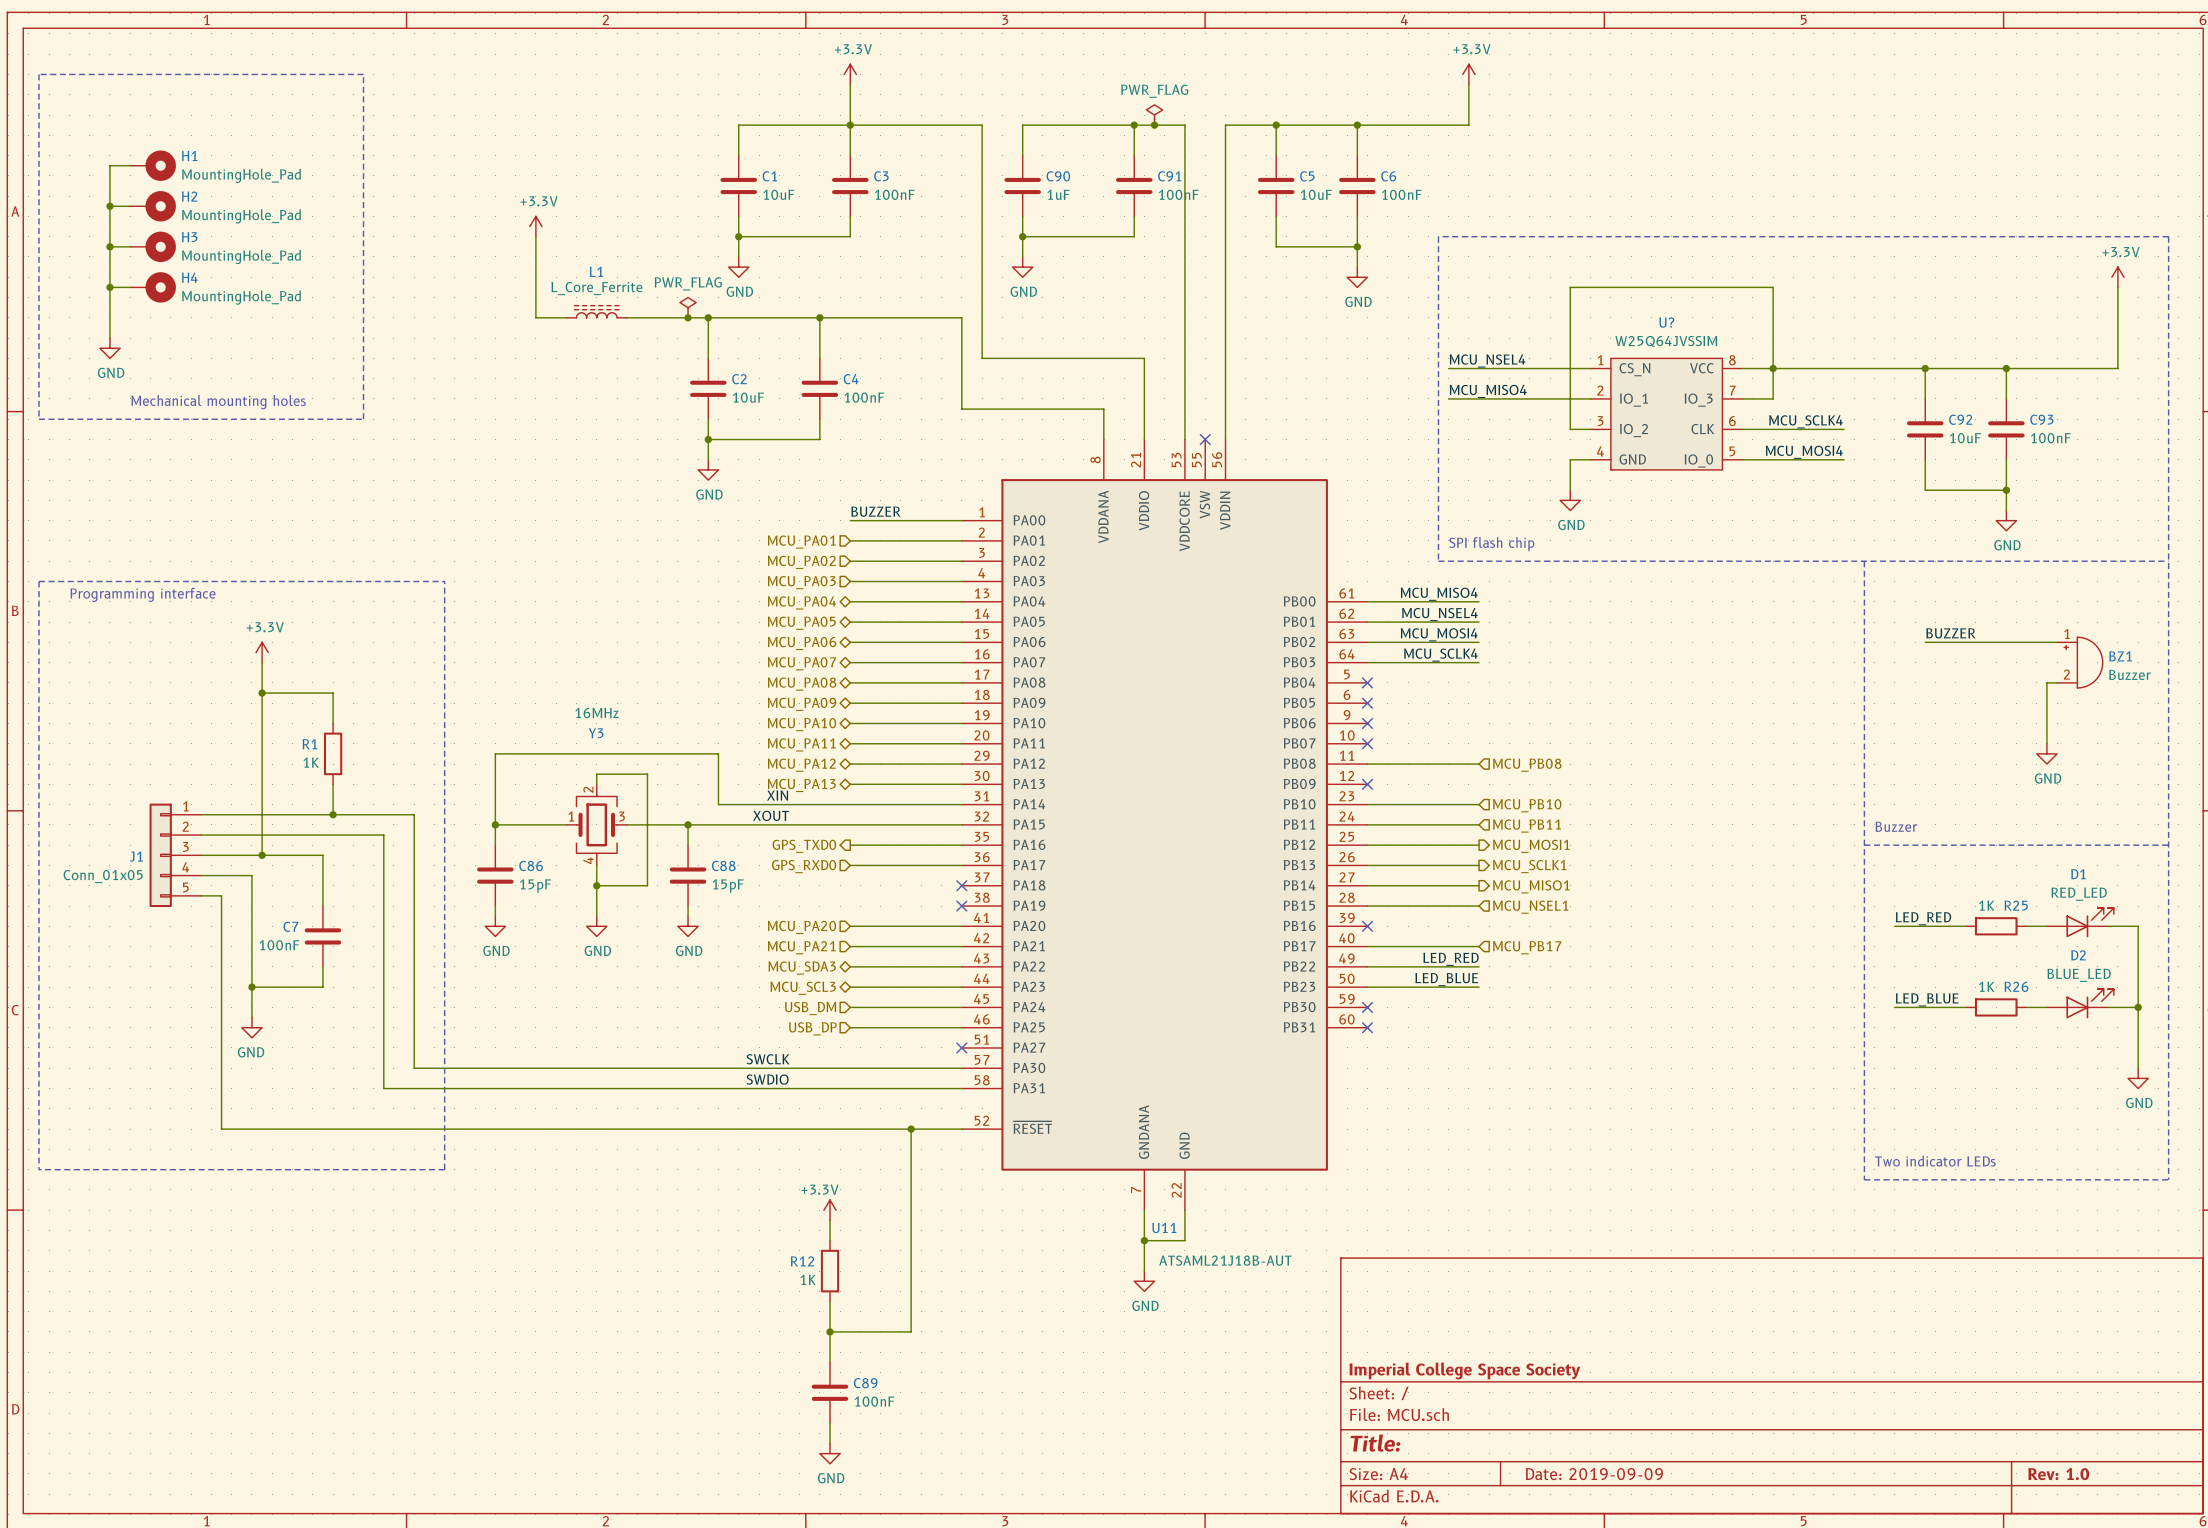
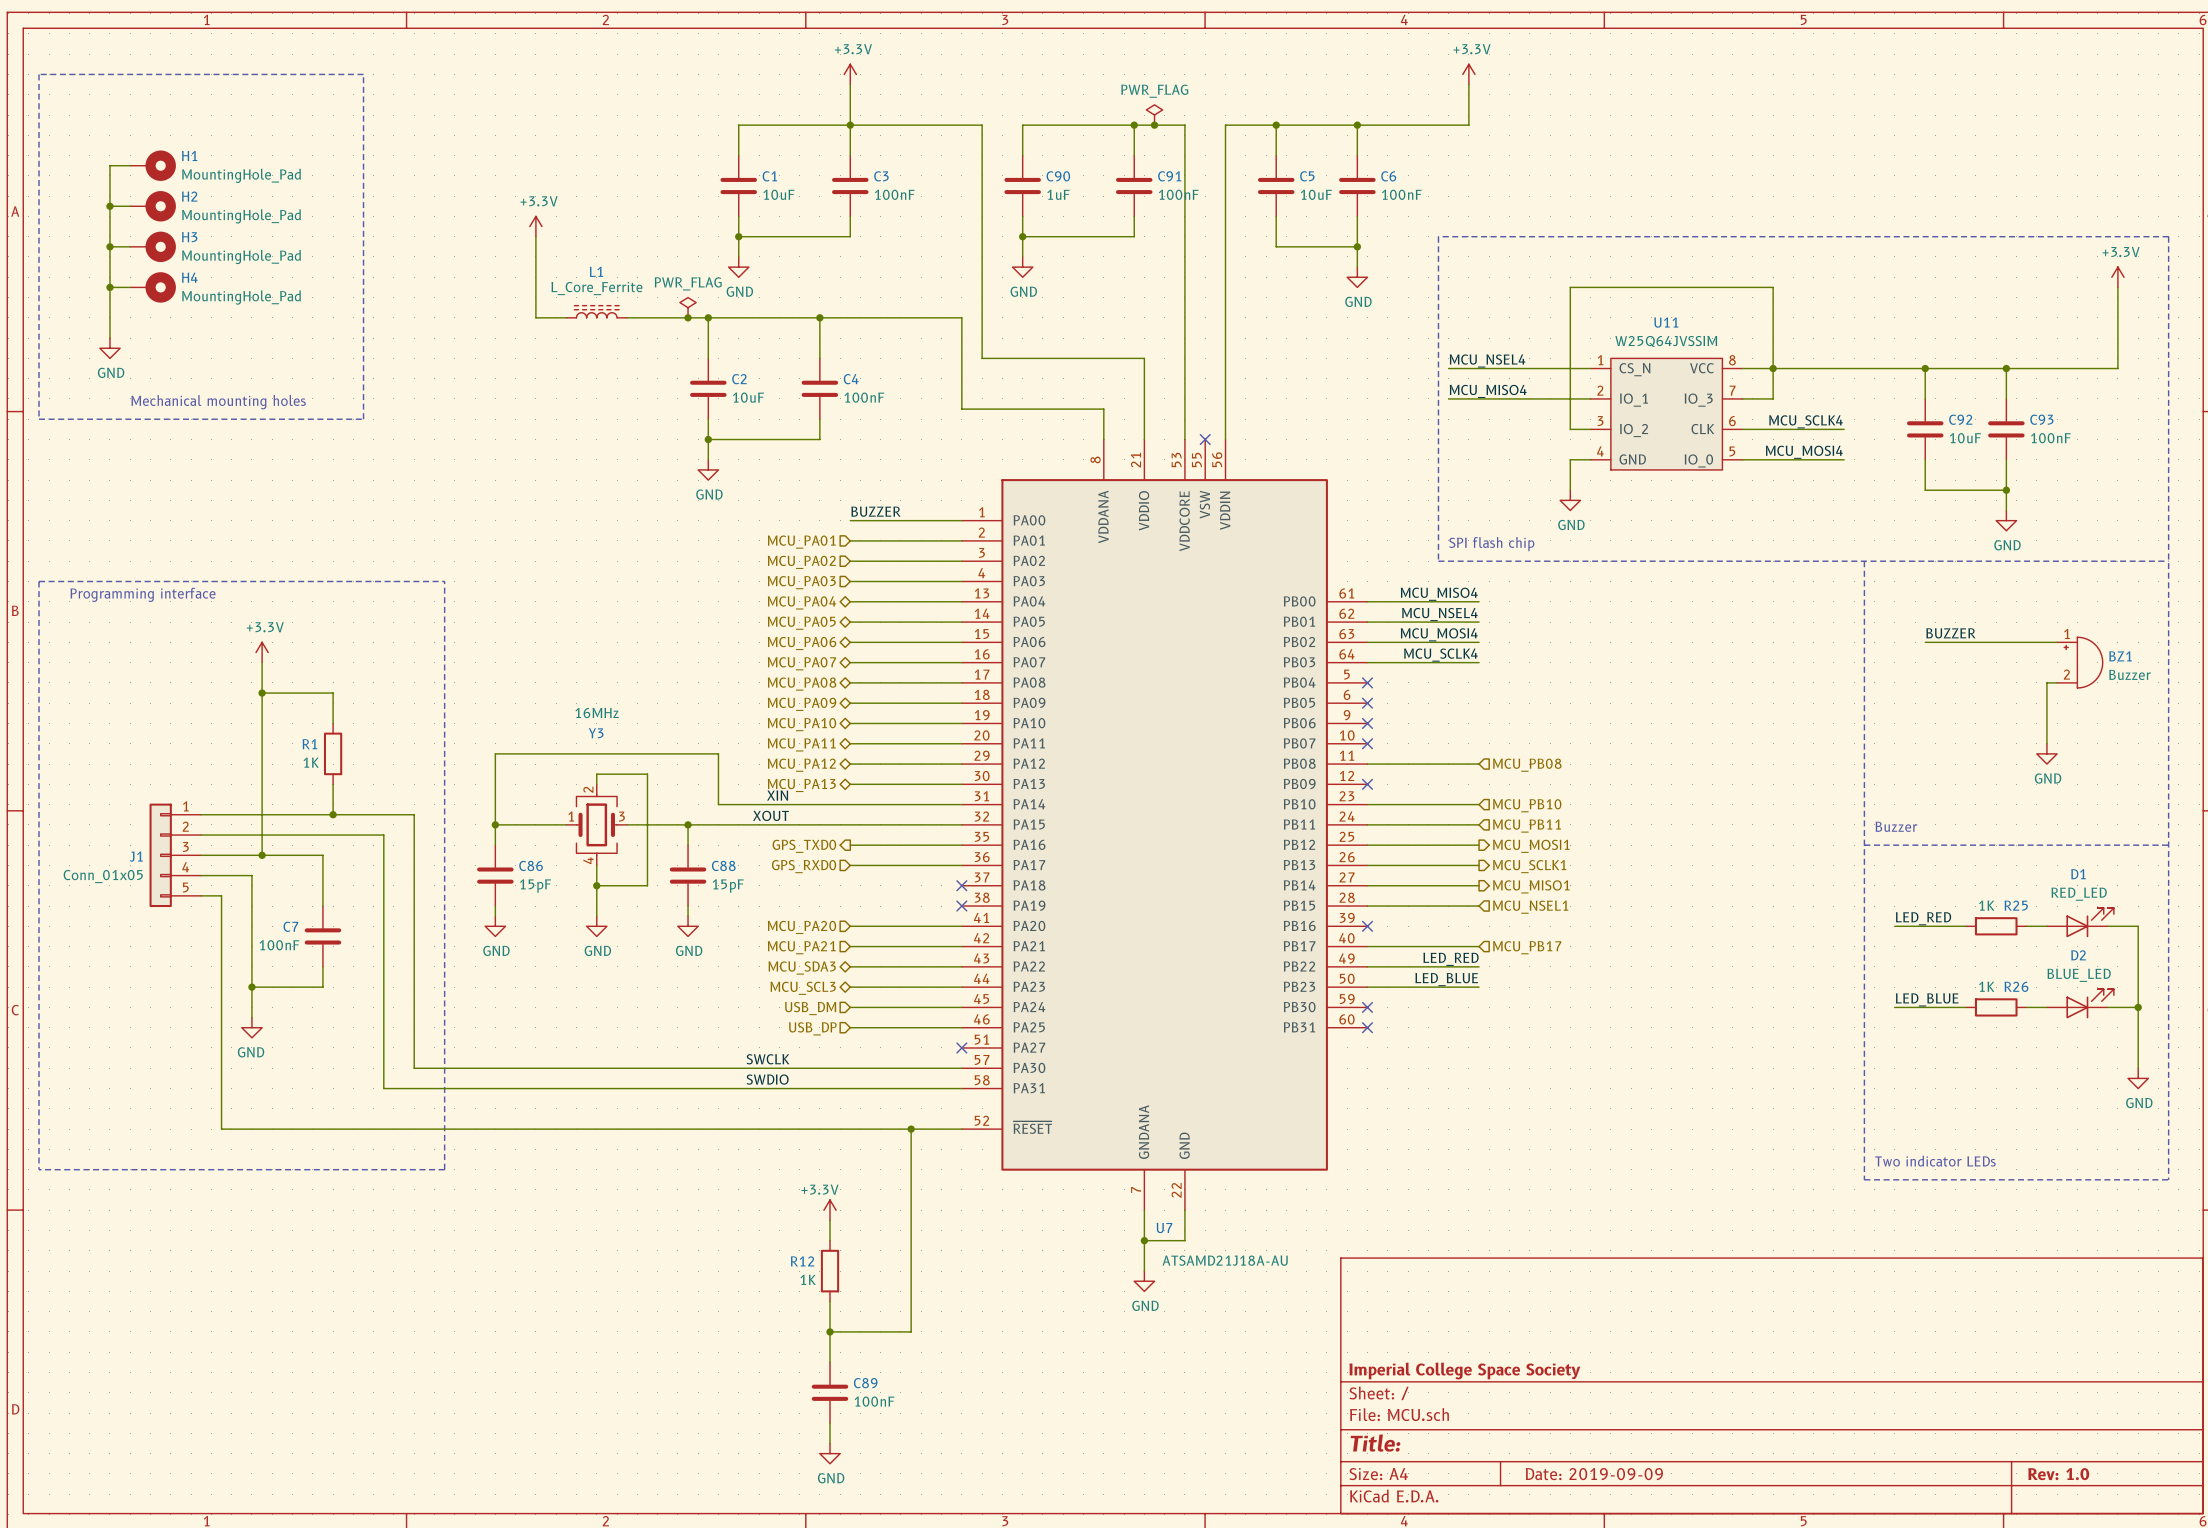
U? name: U? (1666, 322) -> U11 (1666, 322)
U11 name: U11 (1164, 1227) -> U7 (1164, 1227)
U11 value: ATSAML21J18B-AUT (1225, 1260) -> ATSAMD21J18A-AU (1225, 1260)

